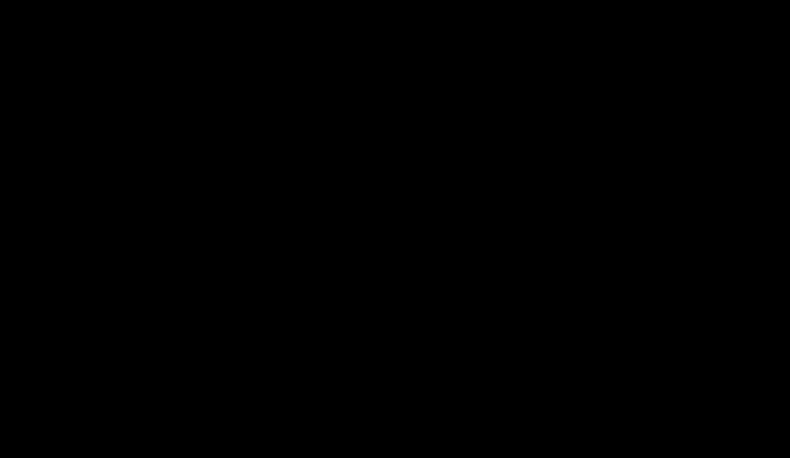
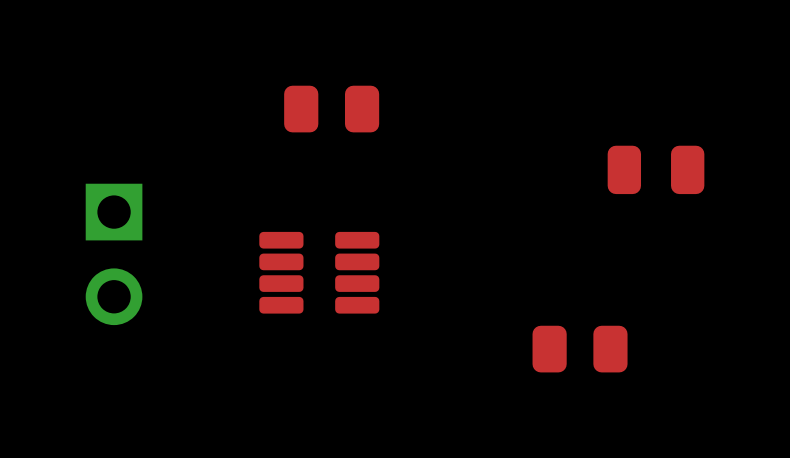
part: none -> (331, 109)
part: none -> (656, 169)
part: none -> (114, 254)
part: none -> (319, 272)
part: none -> (580, 349)

